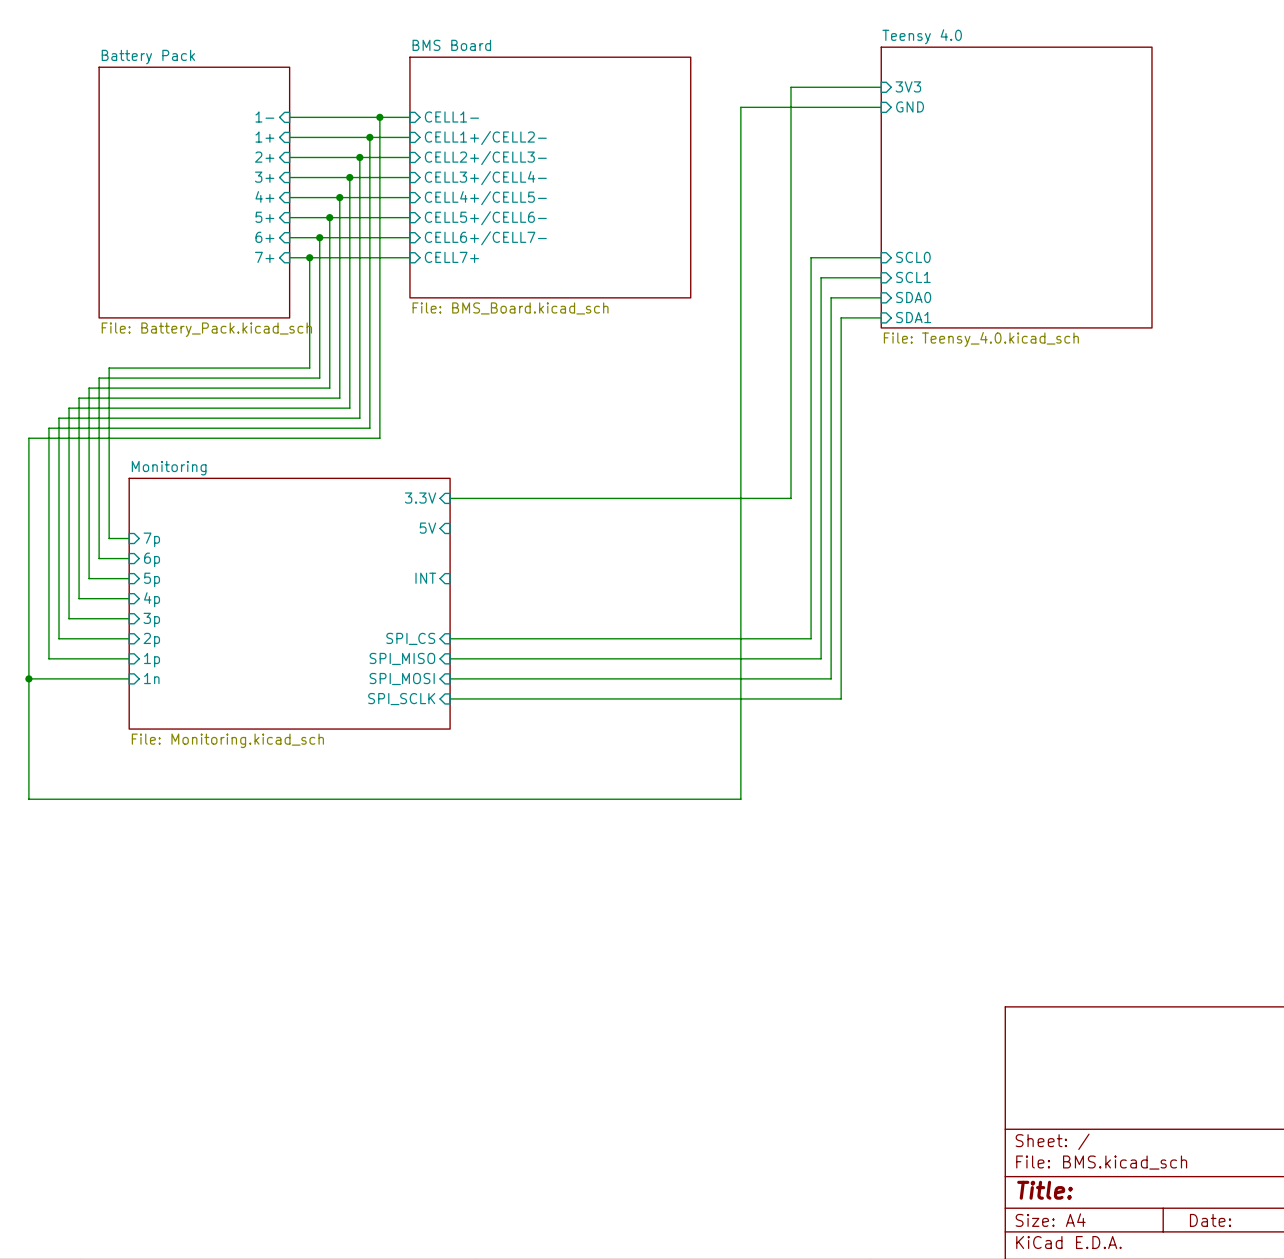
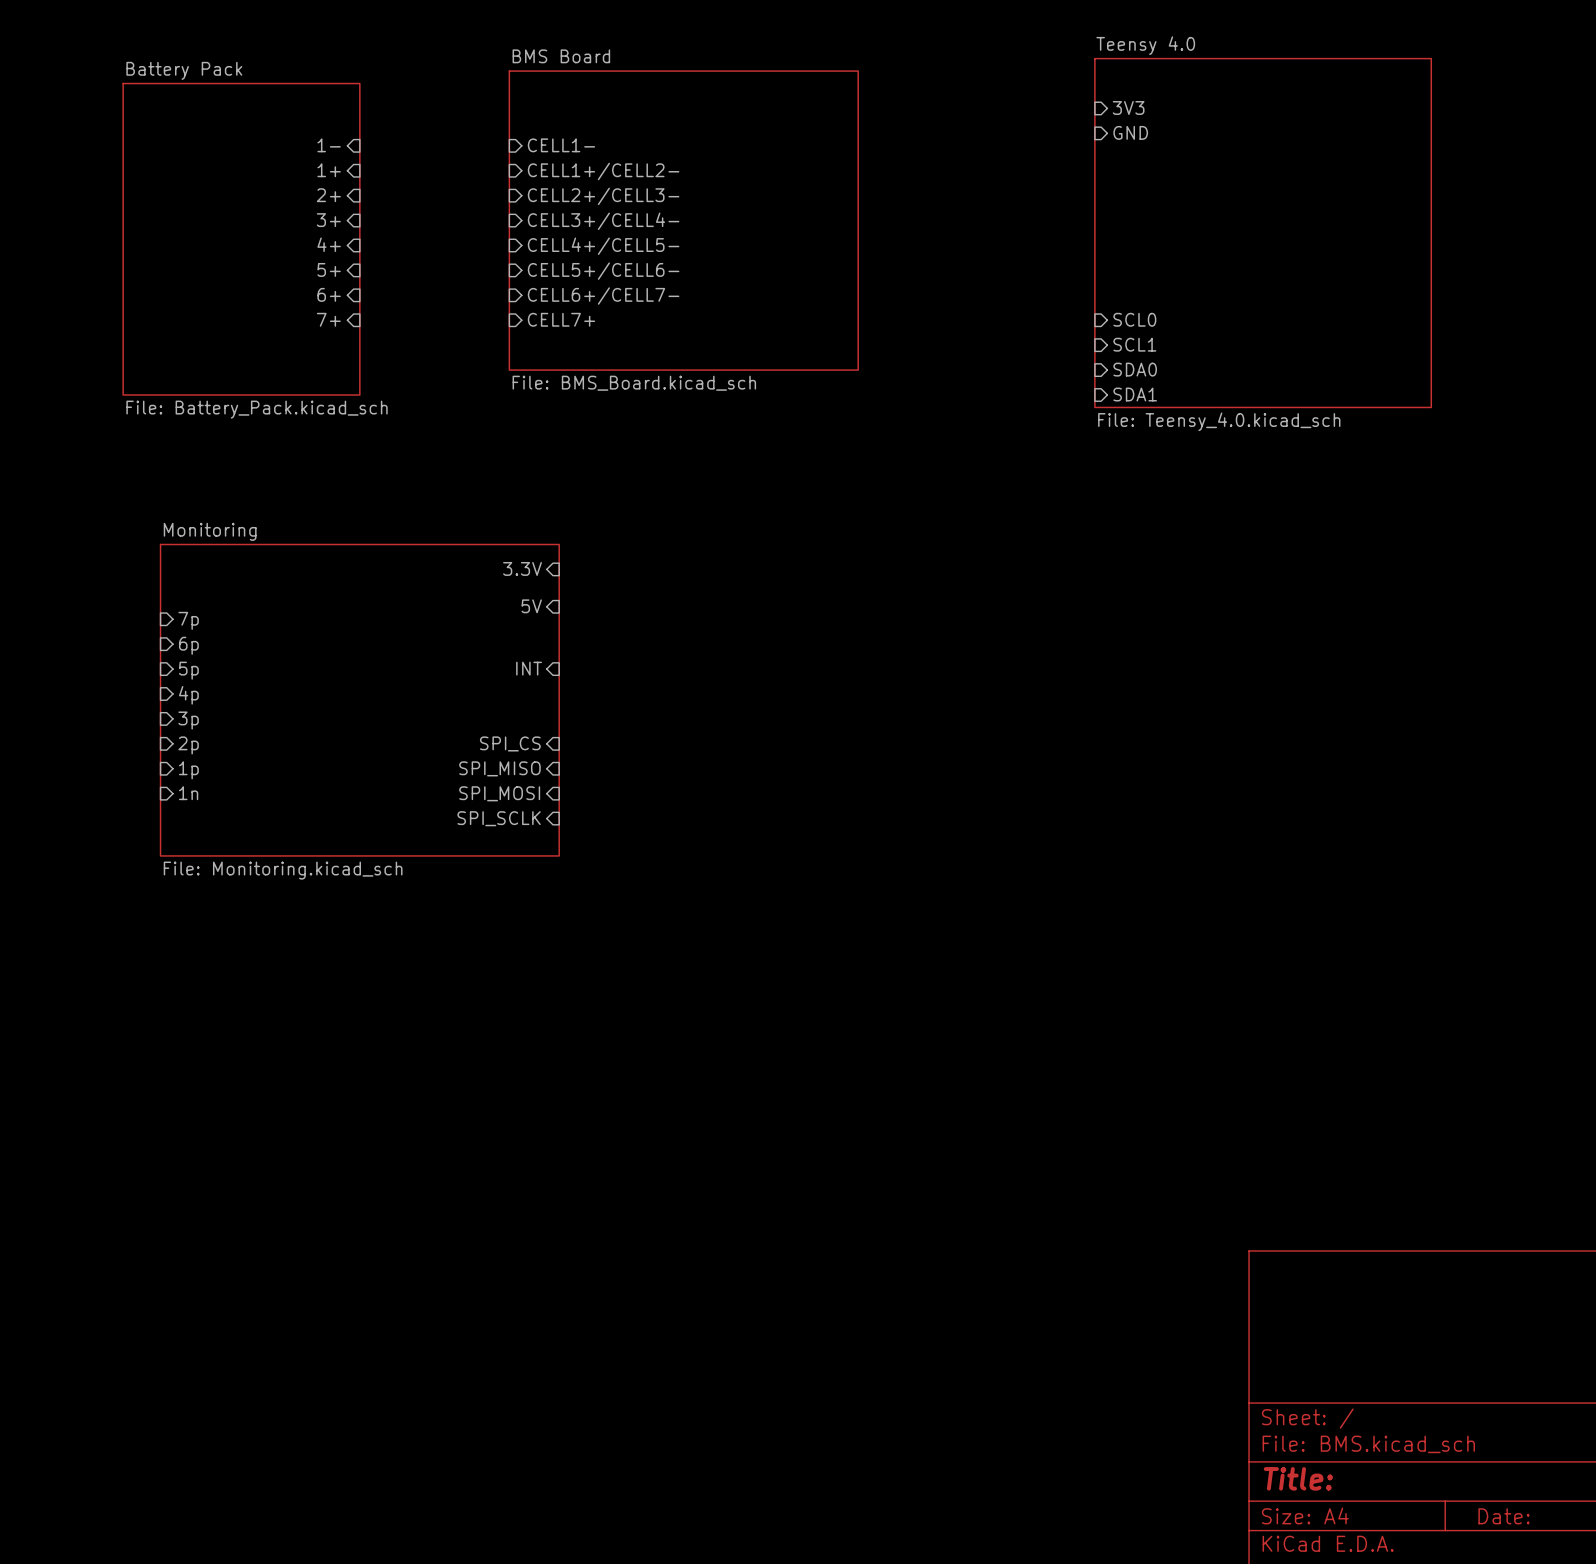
wire: (881, 87) (791, 87) (791, 498) (450, 498) -> none
wire: (881, 107) (740, 107) (740, 799) (28, 799) (28, 438) (379, 438) (379, 117) -> none
wire: (289, 117) (409, 117) -> none
junction: (379, 117) -> none
wire: (289, 137) (409, 137) -> none
wire: (369, 137) (369, 428) (48, 428) (48, 658) (129, 658) -> none
junction: (369, 137) -> none
wire: (289, 157) (409, 157) -> none
wire: (359, 157) (359, 418) (59, 418) (59, 638) (129, 638) -> none
junction: (359, 157) -> none
wire: (289, 177) (409, 177) -> none
wire: (349, 177) (349, 408) (69, 408) (69, 618) (129, 618) -> none
junction: (349, 177) -> none
wire: (289, 197) (409, 197) -> none
wire: (339, 197) (339, 398) (79, 398) (79, 598) (129, 598) -> none
junction: (339, 197) -> none
wire: (289, 217) (409, 217) -> none
wire: (329, 217) (329, 388) (89, 388) (89, 578) (129, 578) -> none
junction: (329, 217) -> none
wire: (289, 237) (409, 237) -> none
wire: (319, 237) (319, 378) (99, 378) (99, 558) (129, 558) -> none
junction: (319, 237) -> none
wire: (289, 257) (409, 257) -> none
wire: (309, 257) (309, 368) (109, 368) (109, 538) (129, 538) -> none
junction: (309, 257) -> none
wire: (881, 257) (811, 257) (811, 638) (450, 638) -> none
wire: (881, 277) (821, 277) (821, 658) (450, 658) -> none
wire: (881, 297) (831, 297) (831, 678) (450, 678) -> none
wire: (881, 317) (841, 317) (841, 698) (450, 698) -> none
sheet pin position: 3.3V (420, 498) -> 3.3V (522, 568)
sheet pin: none -> 7p (188, 620)
sheet pin: none -> 6p (188, 645)
sheet pin position: 5V (427, 528) -> 5V (531, 606)
sheet pin: 7p (151, 539) -> 5p (188, 670)
sheet pin: 6p (152, 559) -> 4p (188, 695)
sheet pin position: INT (425, 578) -> INT (529, 668)
sheet pin: 5p (152, 579) -> 3p (188, 720)
sheet pin: none -> SPI_CS (510, 743)
sheet pin: 4p (152, 599) -> 2p (188, 745)
sheet Monitoring position: (289, 603) -> (359, 700)
sheet pin: none -> SPI_MISO (499, 768)
sheet pin: 3p (151, 620) -> 1p (188, 770)
sheet pin: SPI_CS (410, 638) -> SPI_MOSI (499, 793)
sheet pin: 2p (151, 640) -> 1n (188, 793)
sheet pin: SPI_MISO (402, 658) -> SPI_SCLK (499, 818)
sheet pin: 1p (152, 660) -> none
wire: (28, 678) (129, 678) -> none
junction: (28, 678) -> none
sheet pin: 1n (151, 678) -> none
sheet pin: SPI_MOSI (402, 679) -> none
sheet pin: SPI_SCLK (401, 699) -> none

